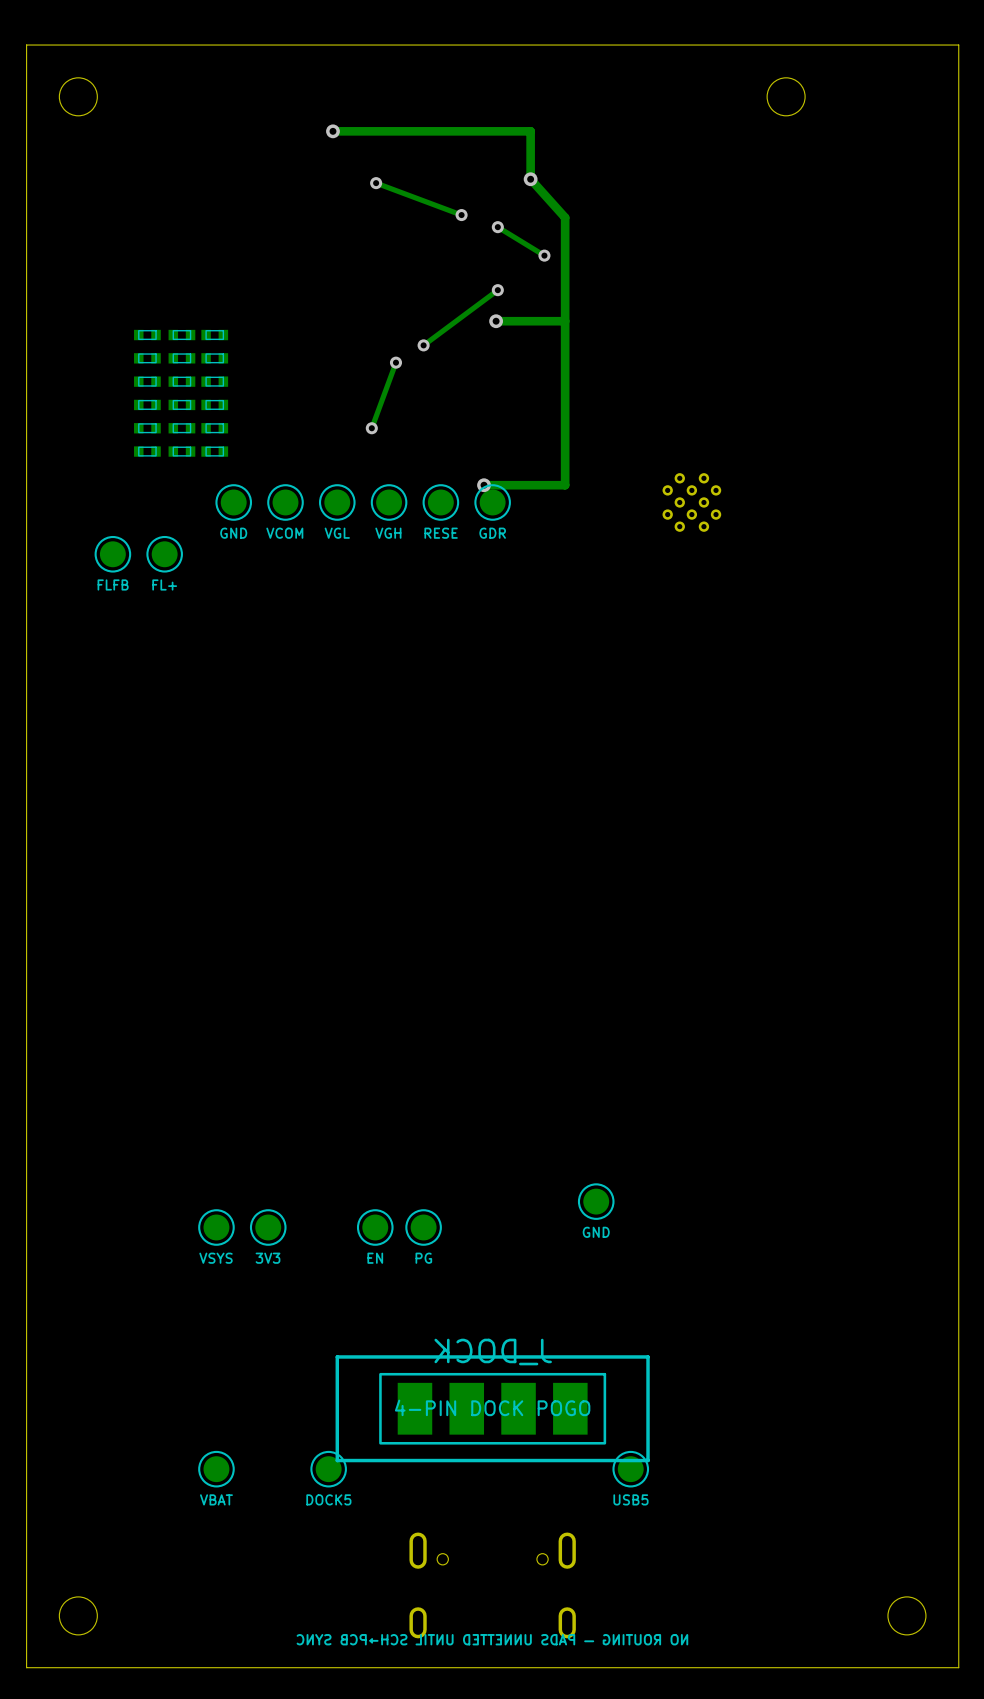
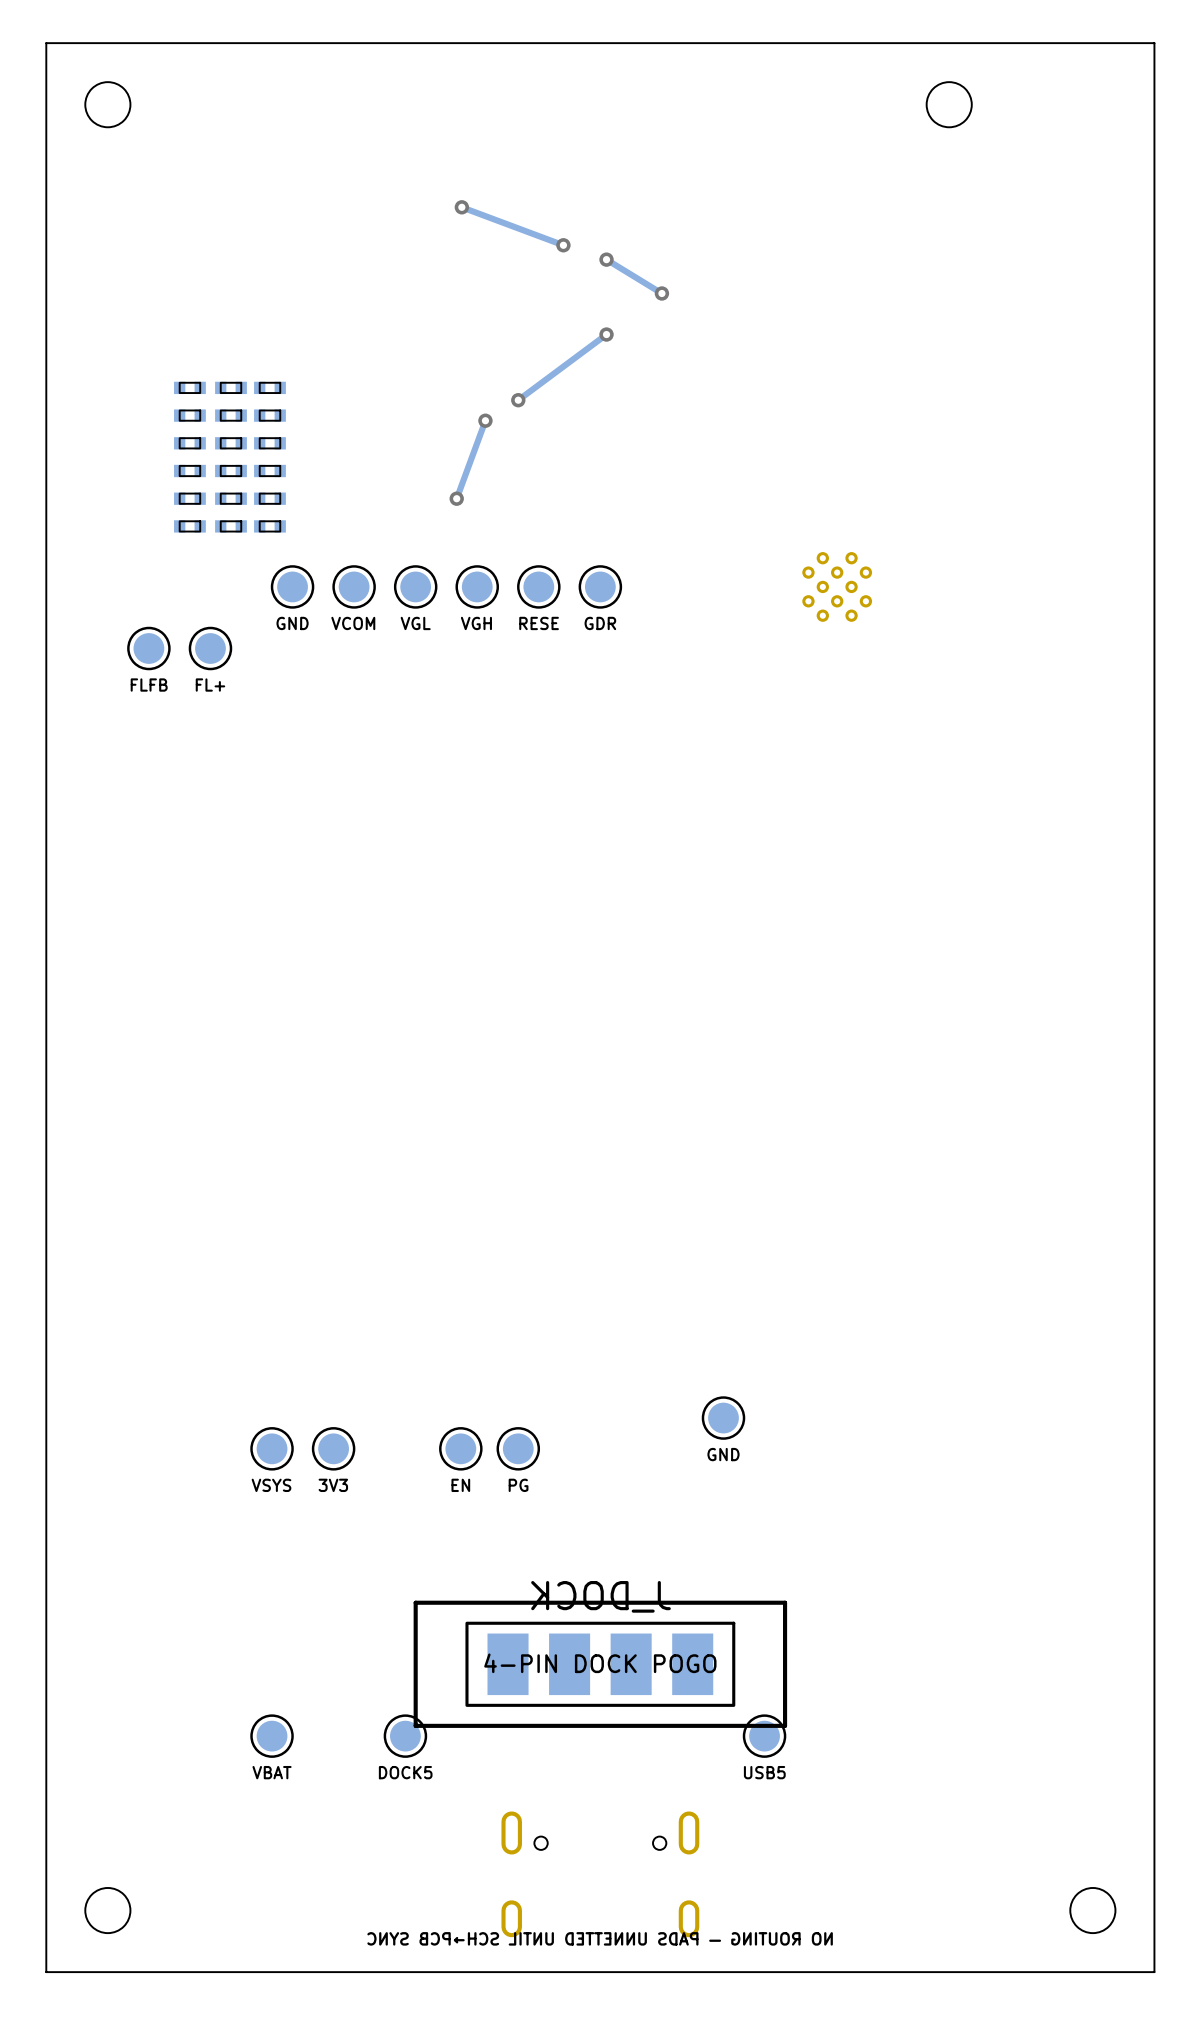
track: (332, 131) (530, 131) (530, 179) (565, 217) (565, 485) (484, 485) -> none
via: (332, 131) -> none
via: (530, 179) -> none
via: (496, 321) -> none
track: (565, 321) (496, 321) -> none
via: (484, 485) -> none

